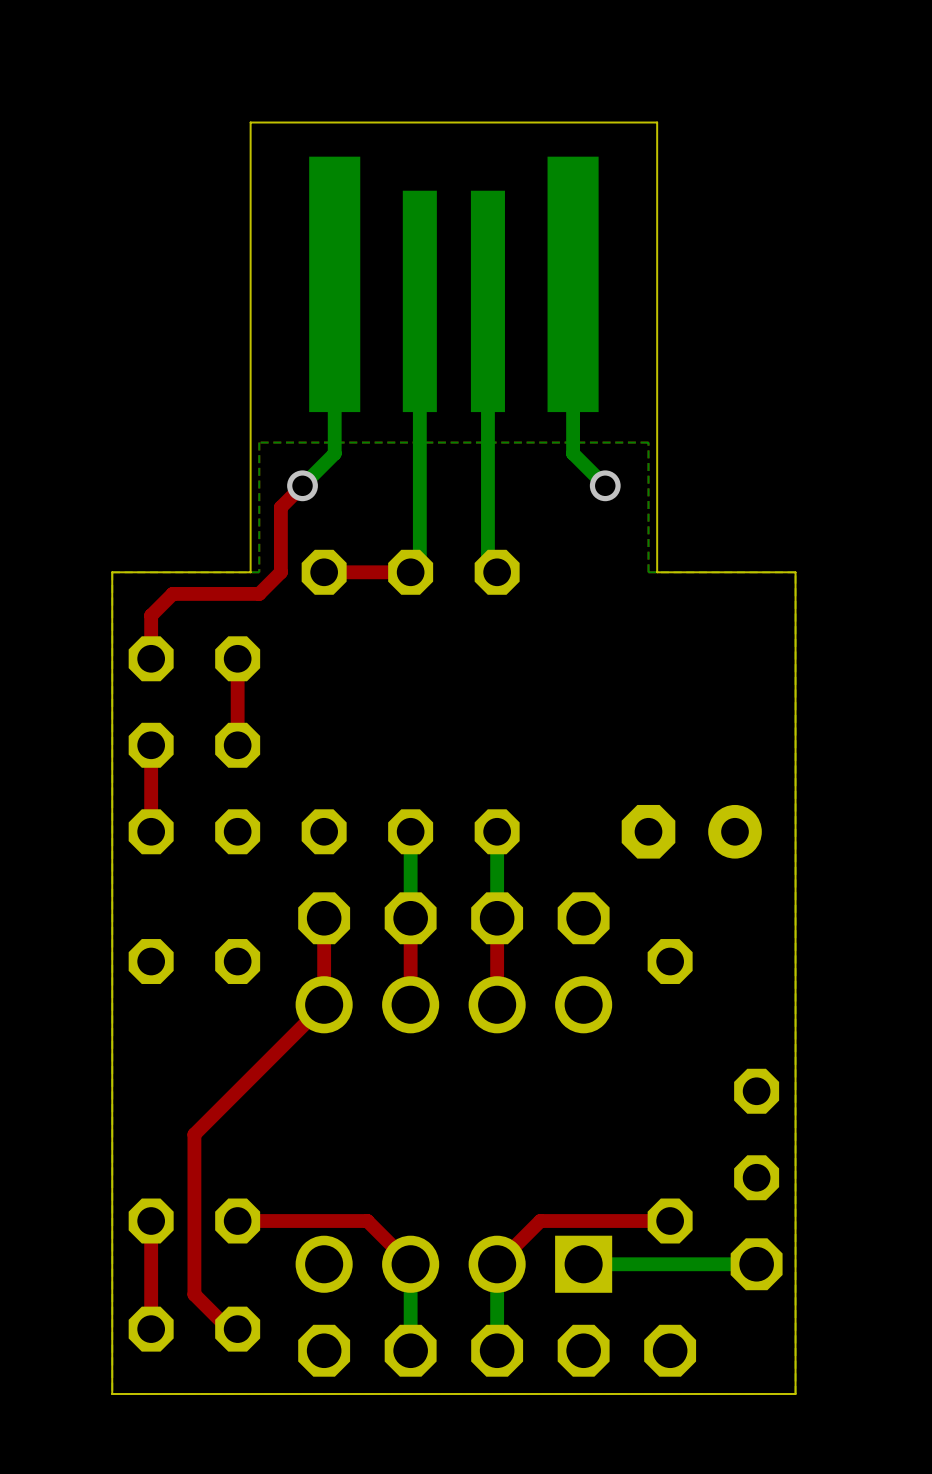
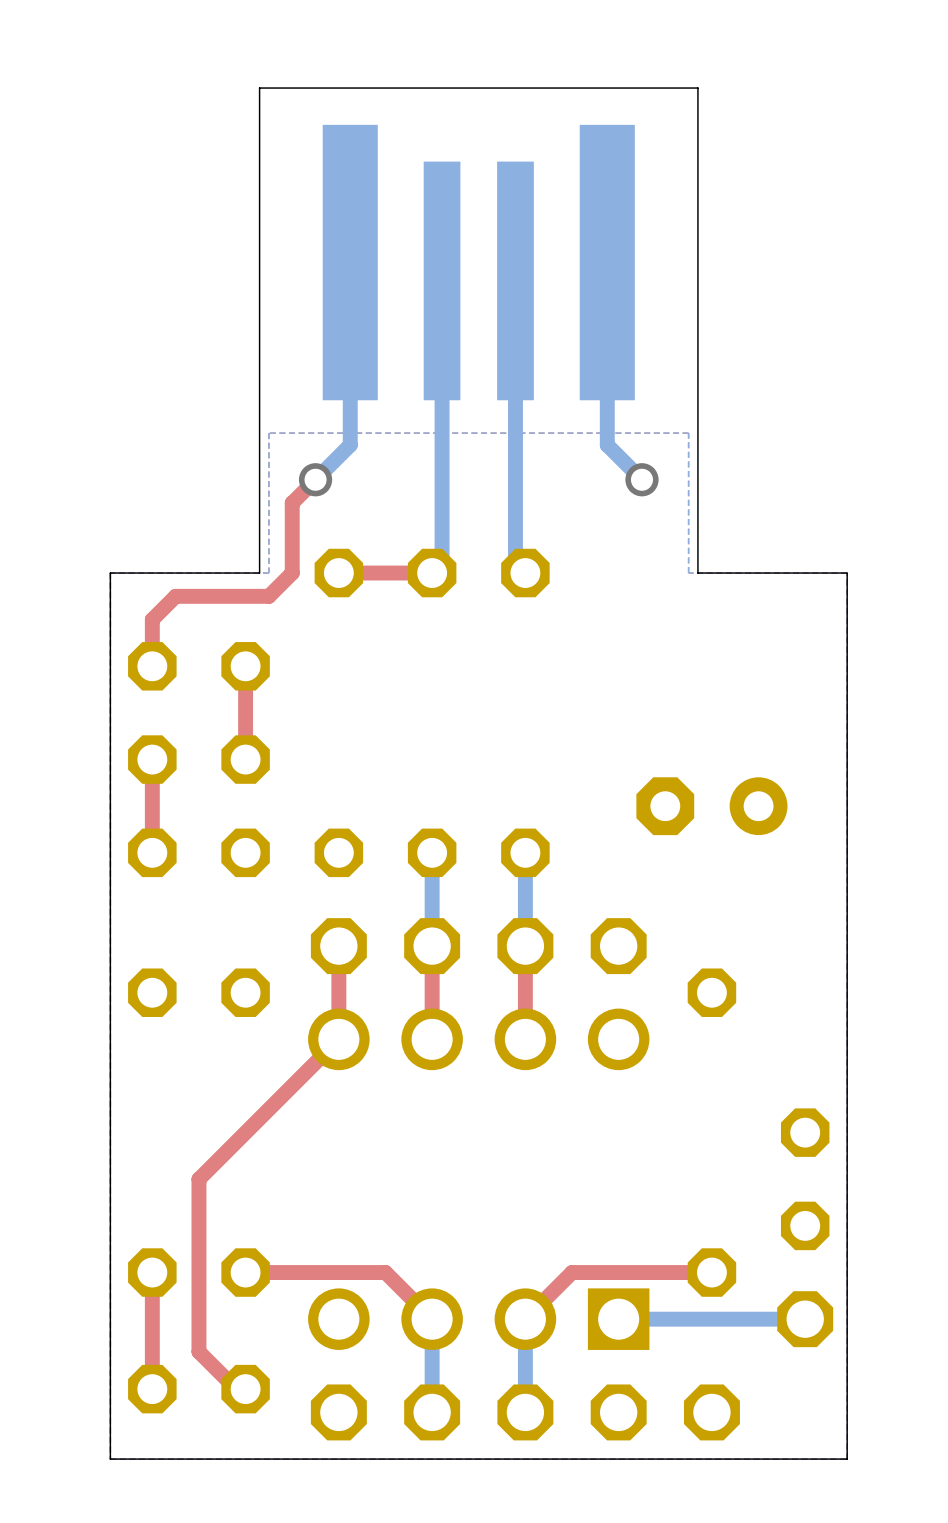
part position: (691, 831) -> (711, 806)

